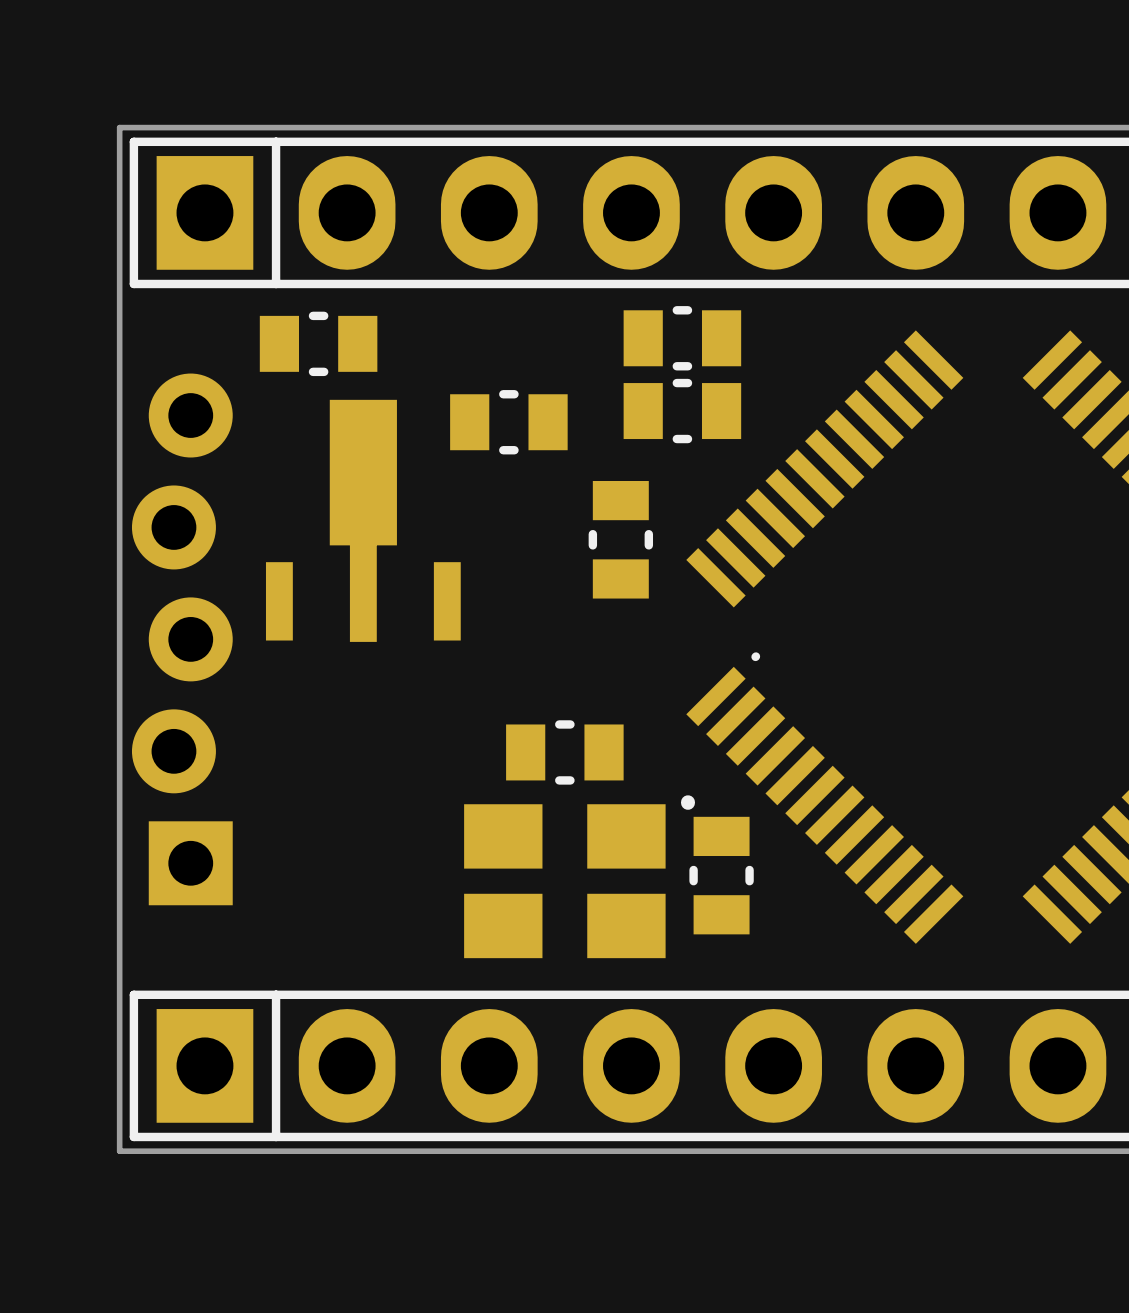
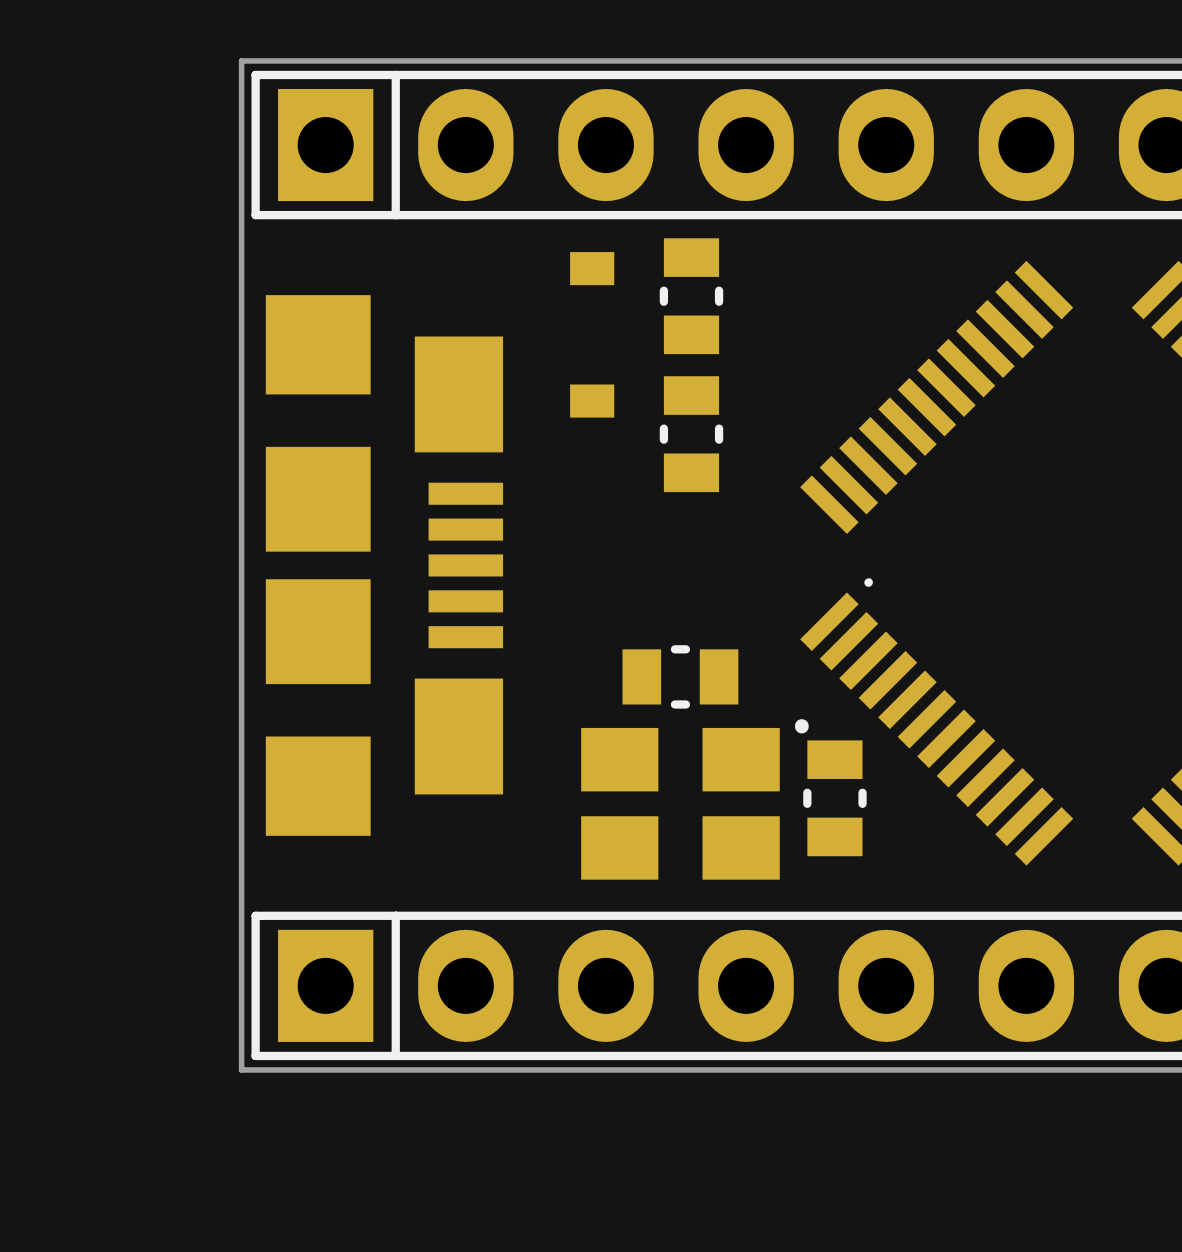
part: (682, 338) -> none
part: (318, 343) -> none
part: none -> (691, 296)
part footprint: [450, 390, 568, 455] -> [570, 252, 615, 418]
part: (682, 411) -> none
part: (363, 520) -> none
part position: (620, 539) -> (691, 434)
part: (182, 639) -> none
part: none -> (384, 565)

